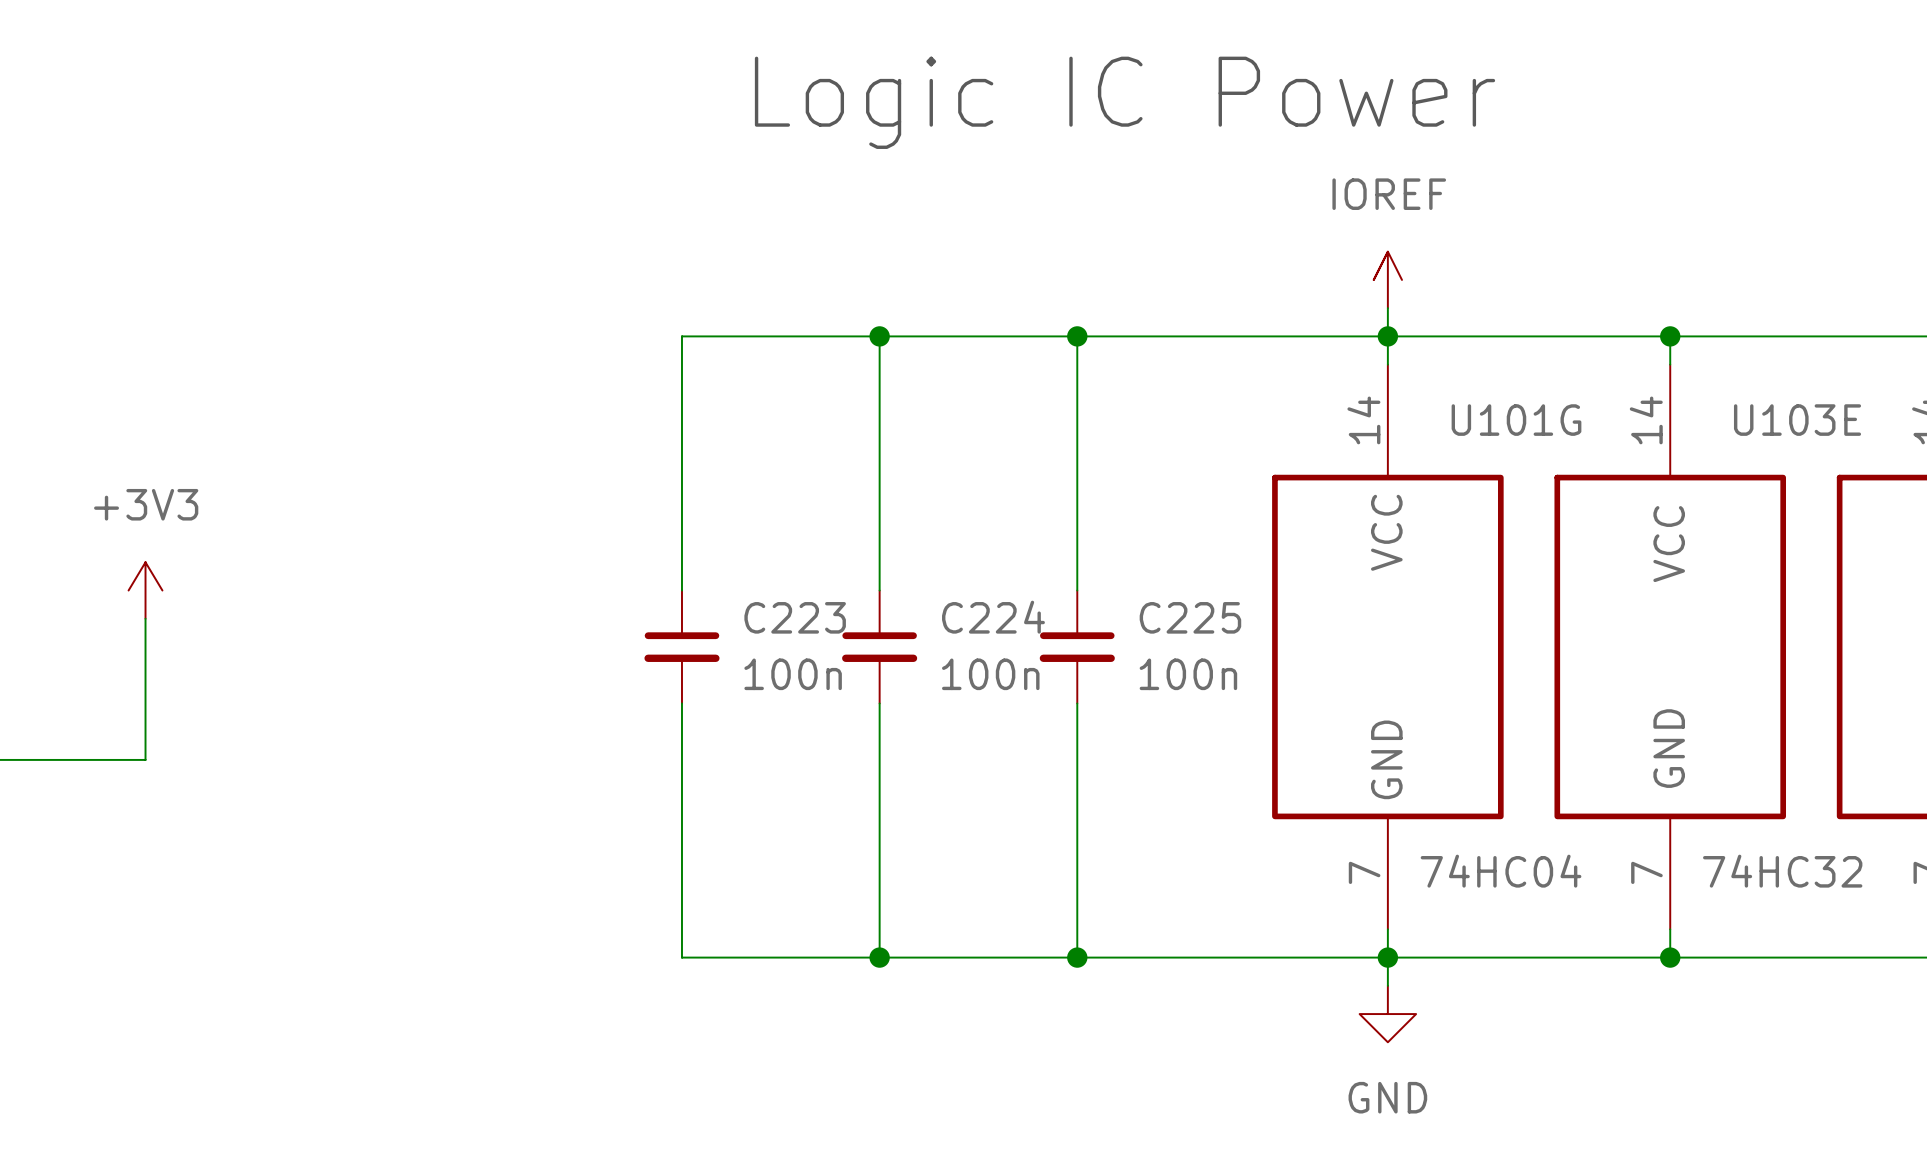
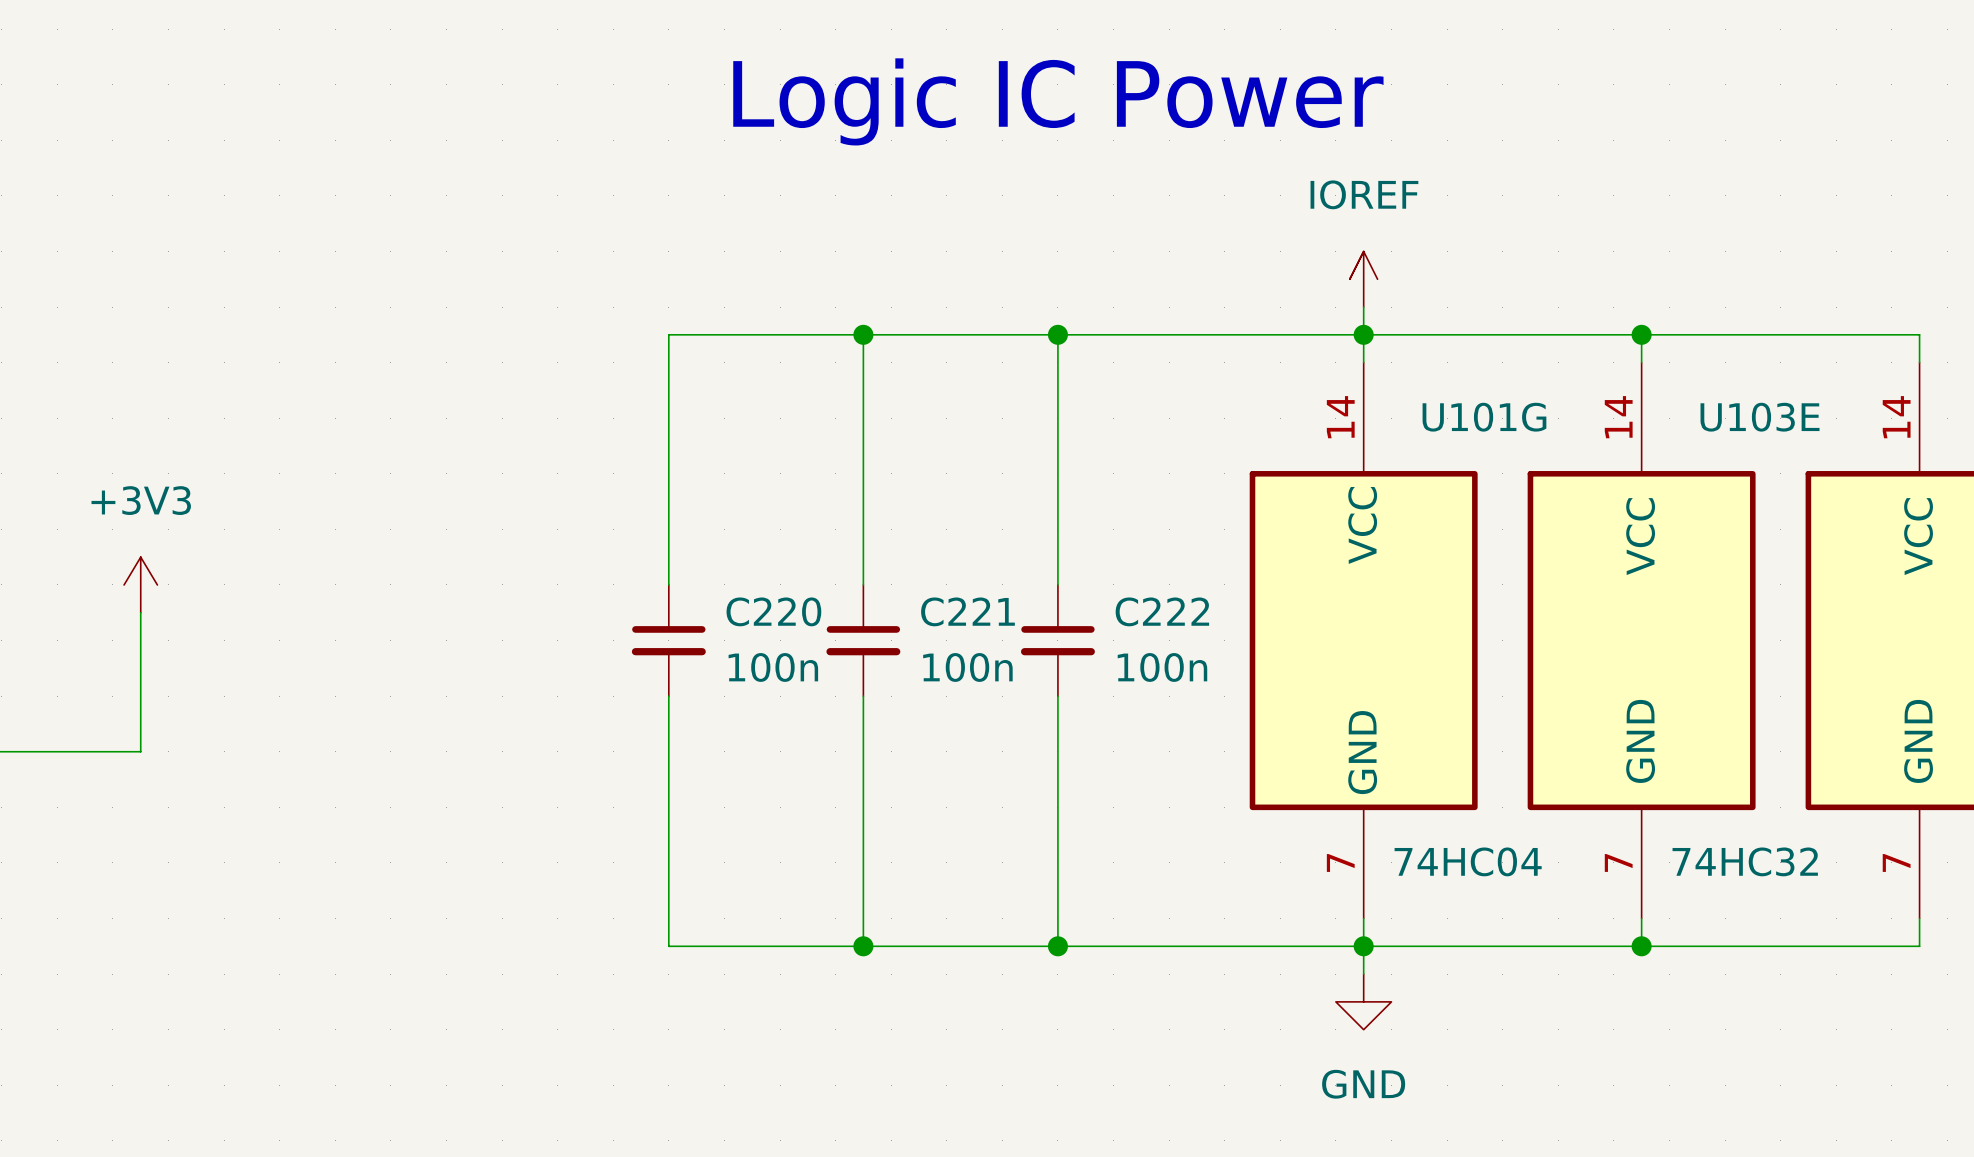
C223 name: C223 (795, 617) -> C220 (773, 611)
C224 name: C224 (993, 617) -> C221 (967, 611)
C225 name: C225 (1190, 617) -> C222 (1162, 611)

